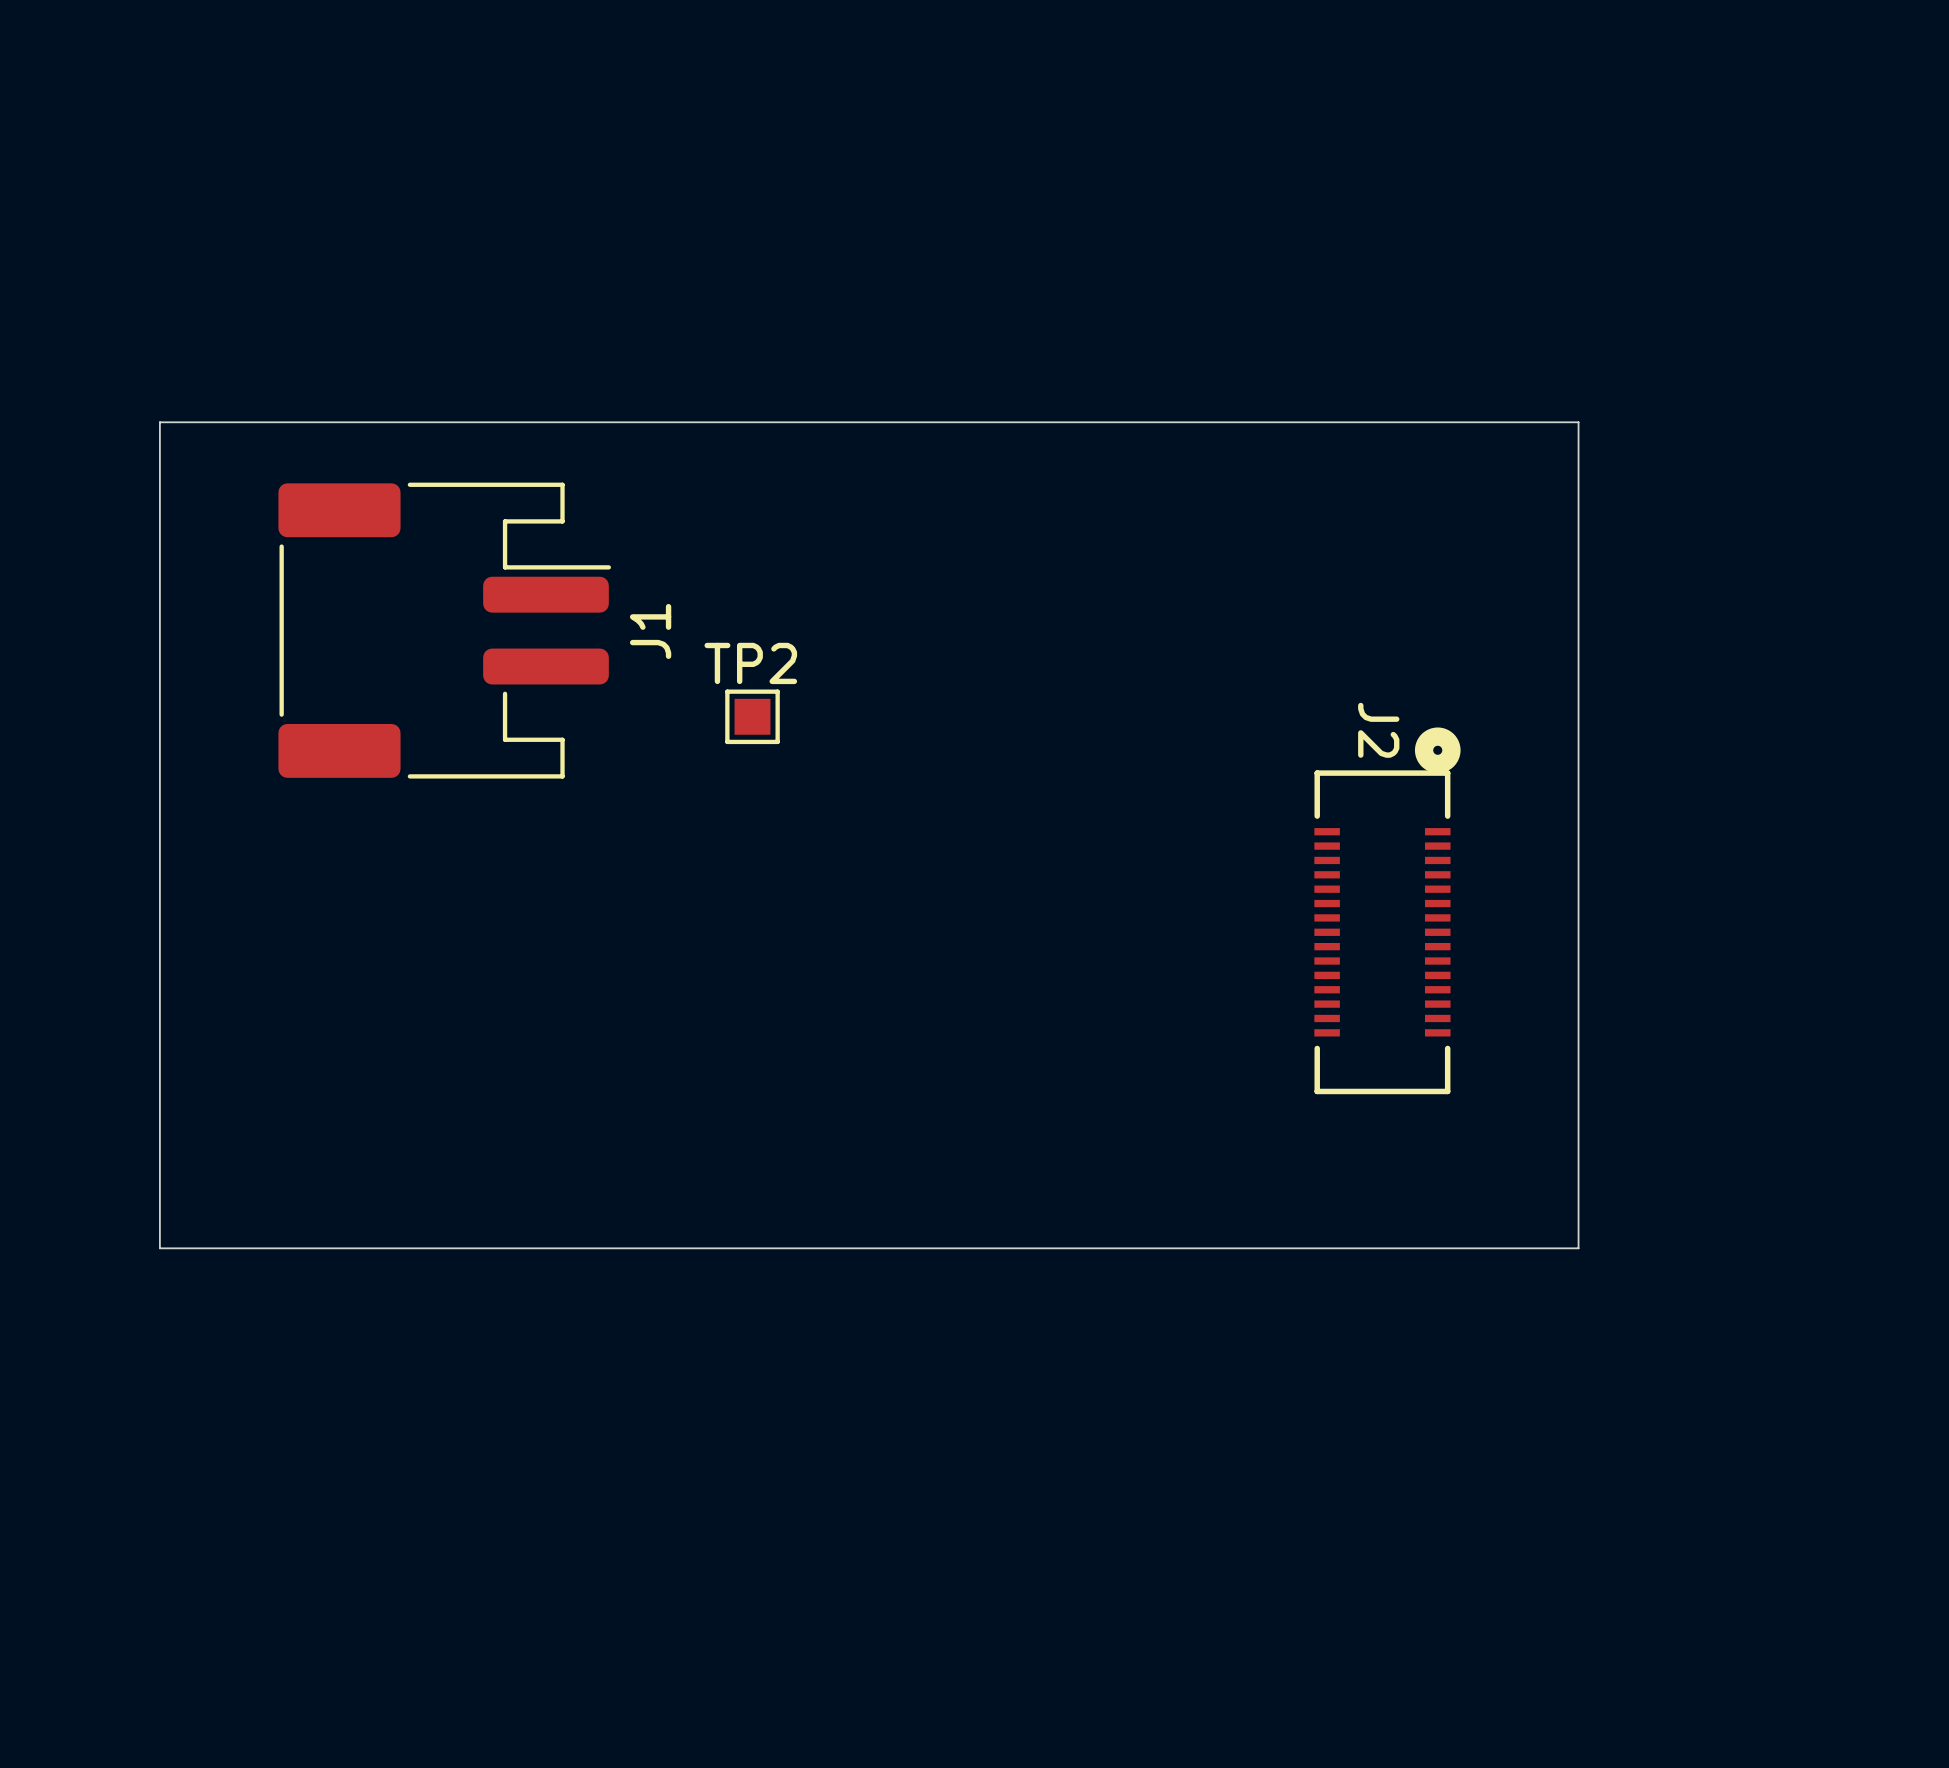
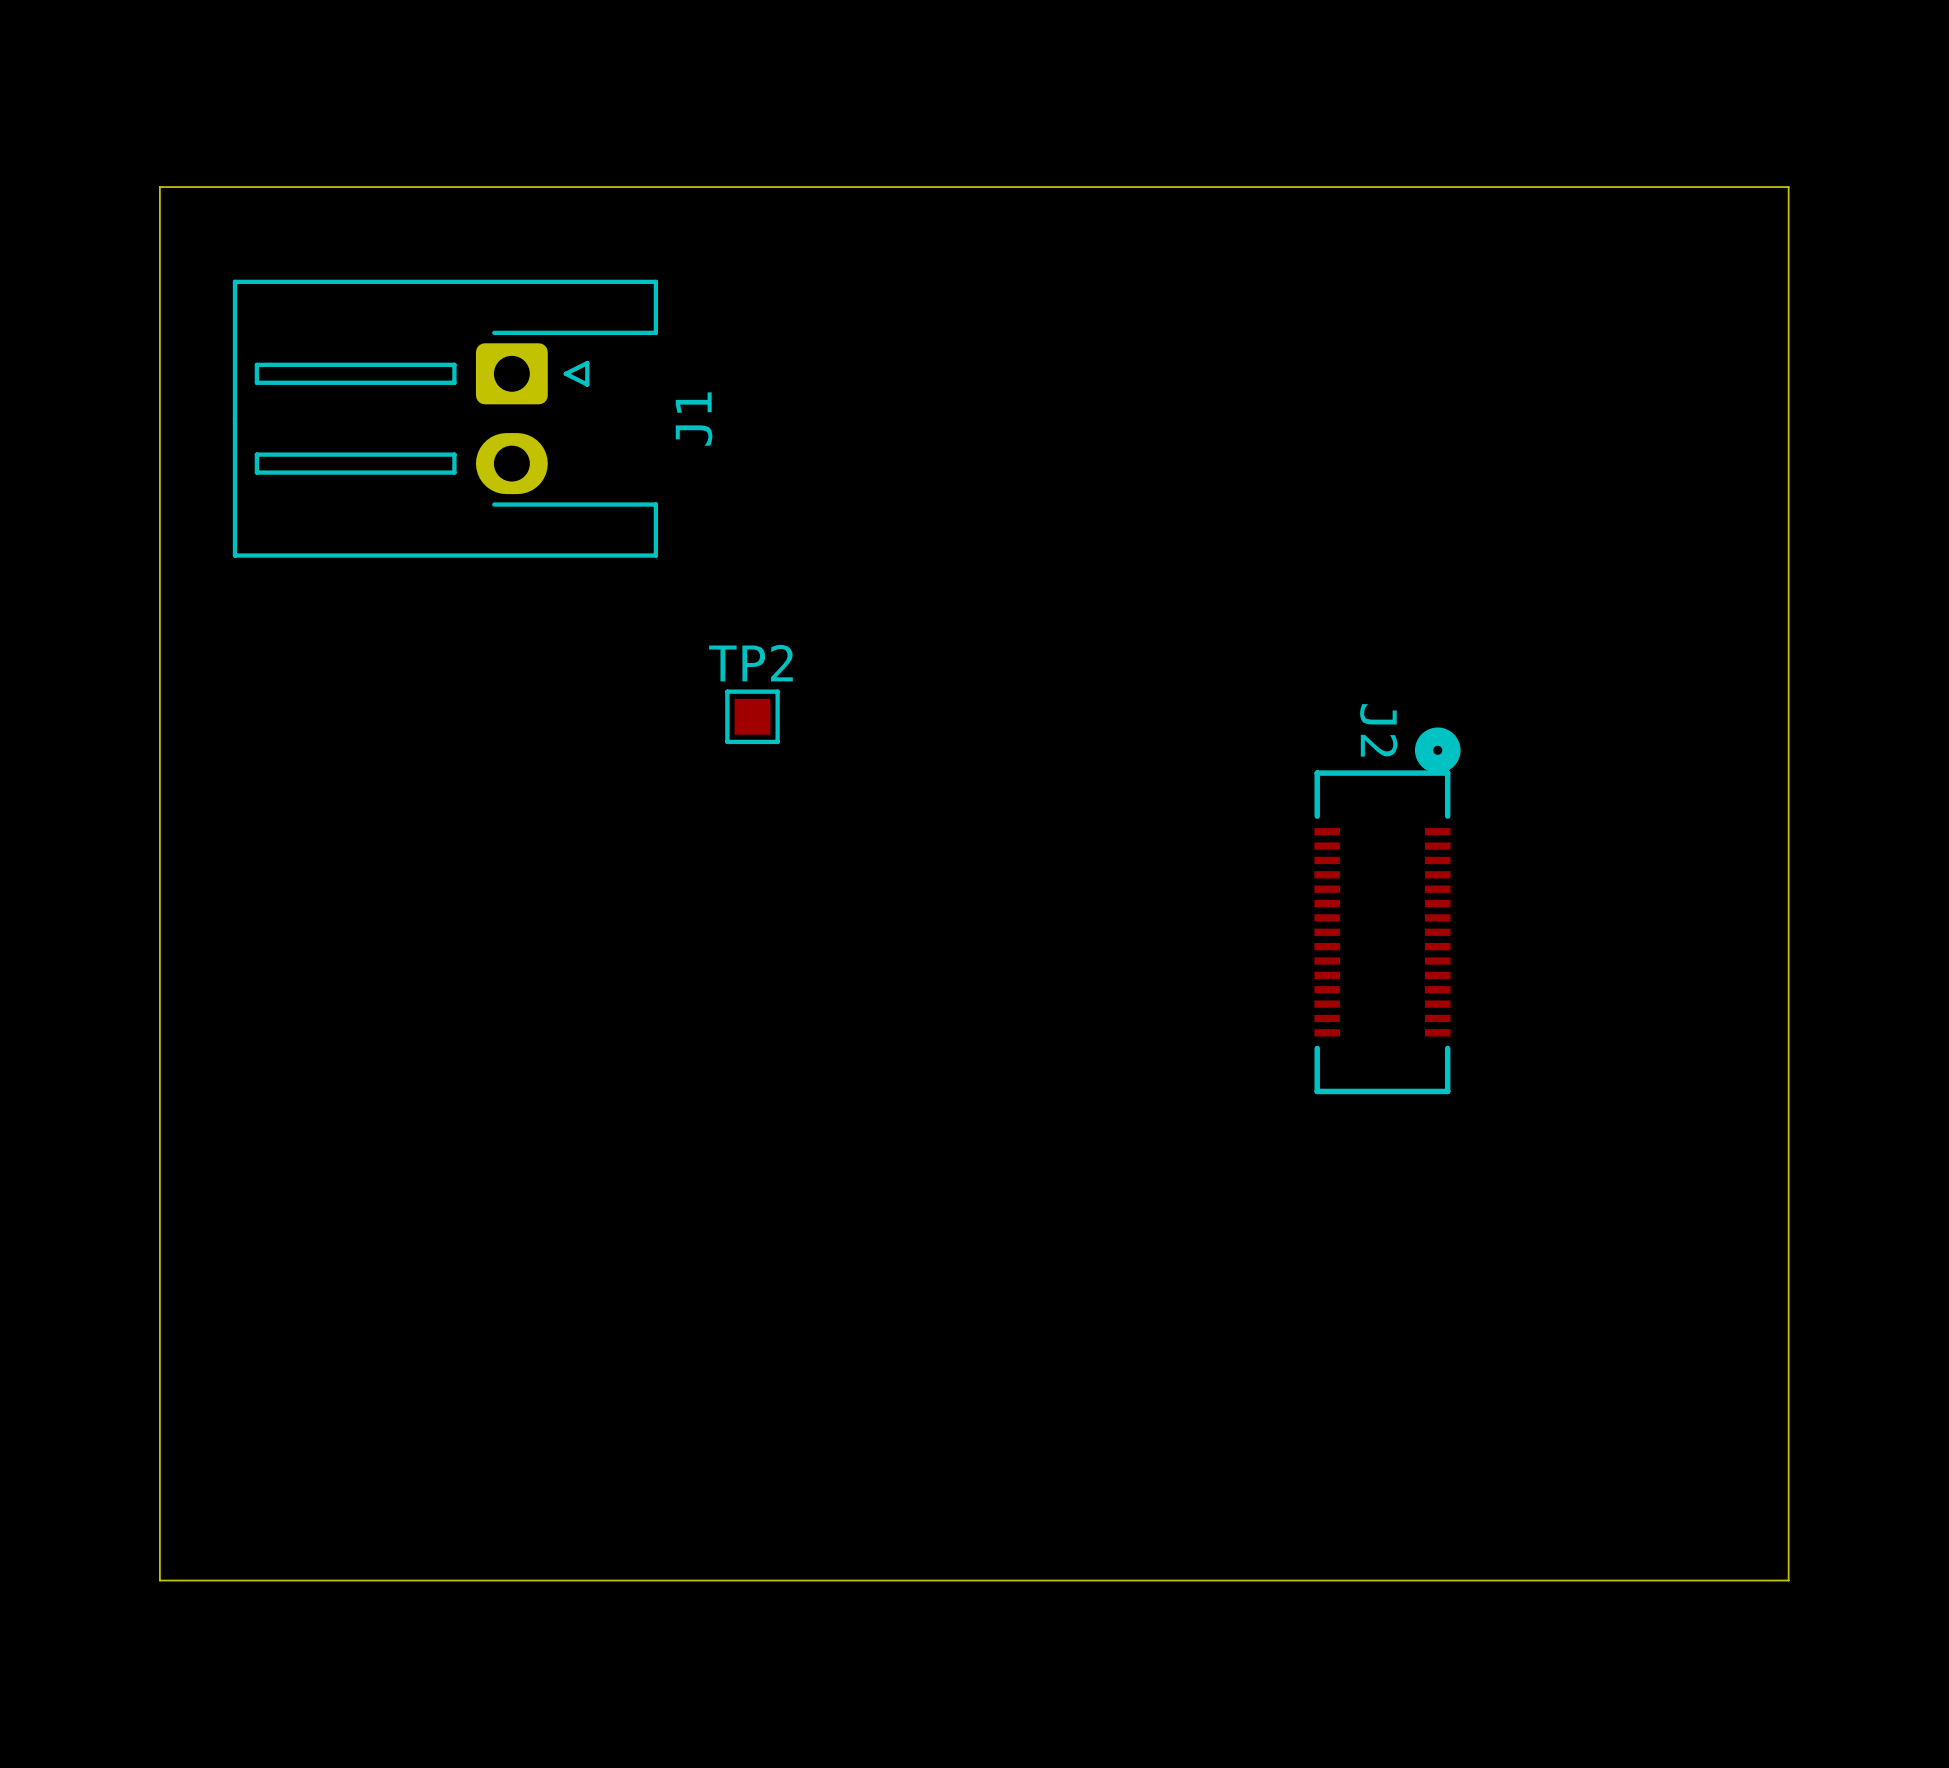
board edge: (159, 422) (1578, 422) (1578, 1248) (159, 1248) -> (159, 422) (159, 187) (1788, 187) (1788, 1580) (159, 1580) (159, 1248)
J1 footprint: [278, 482, 612, 779] -> [232, 279, 659, 558]

